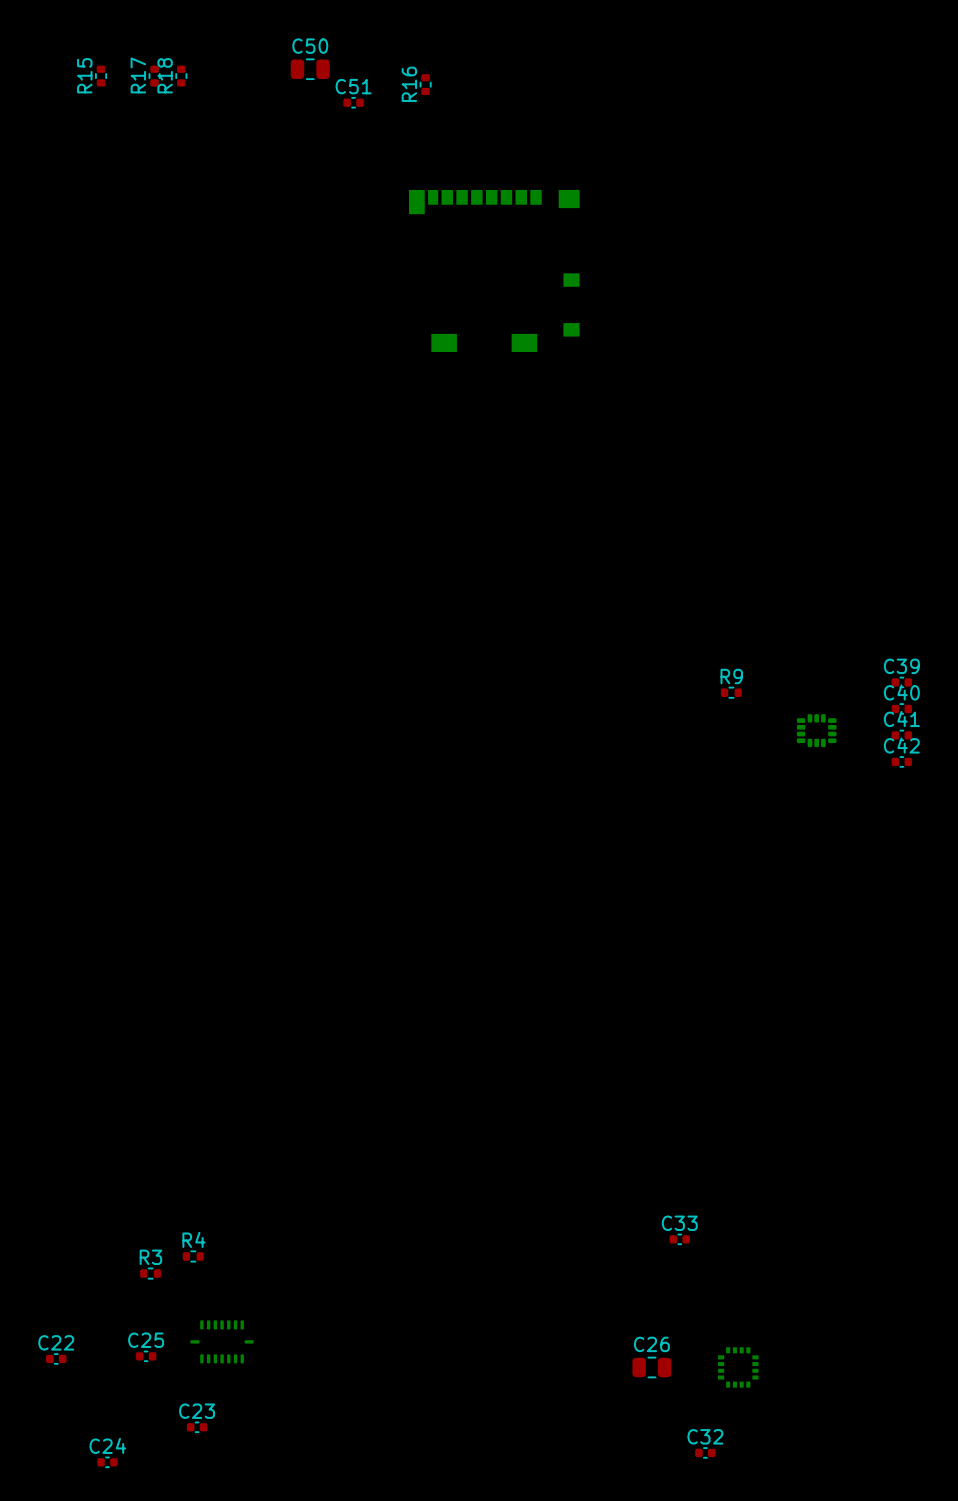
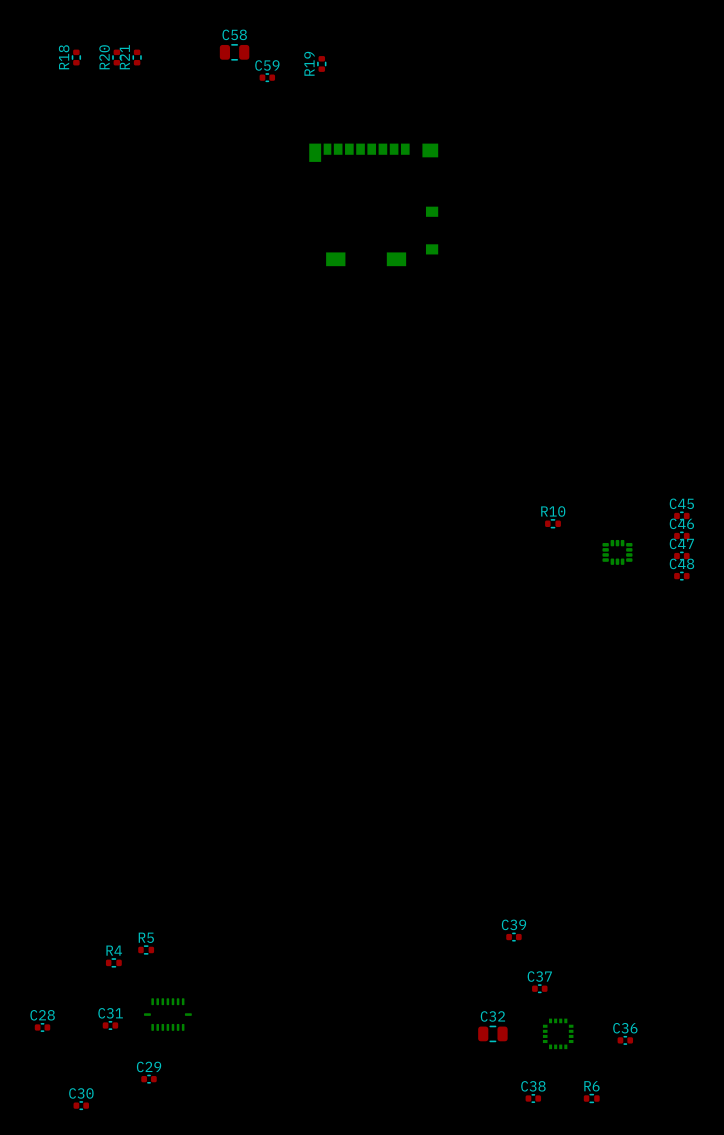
C50 name: C50 (310, 46) -> C58 (234, 34)
R15 name: R15 (84, 75) -> R18 (64, 57)
R17 name: R17 (138, 75) -> R20 (104, 57)
R18 name: R18 (165, 75) -> R21 (124, 57)
R16 name: R16 (409, 84) -> R19 (309, 63)
C51 name: C51 (353, 86) -> C59 (267, 65)
C39 name: C39 (901, 666) -> C45 (681, 503)
R9 name: R9 (731, 676) -> R10 (553, 511)
C40 name: C40 (901, 692) -> C46 (681, 523)
C41 name: C41 (901, 719) -> C47 (681, 543)
C42 name: C42 (901, 745) -> C48 (681, 563)
C33 name: C33 (679, 1223) -> C39 (513, 924)
R4 name: R4 (193, 1239) -> R5 (146, 937)
R3 name: R3 (150, 1257) -> R4 (114, 950)
C37: none -> (539, 988)
C25 name: C25 (146, 1340) -> C31 (110, 1013)
C22 name: C22 (56, 1342) -> C28 (42, 1015)
C26 name: C26 (651, 1344) -> C32 (492, 1016)
C36: none -> (625, 1040)
C23 name: C23 (197, 1411) -> C29 (149, 1066)
C32 name: C32 (705, 1436) -> C38 (533, 1086)
C24 name: C24 (107, 1445) -> C30 (81, 1093)
R6: none -> (591, 1098)

